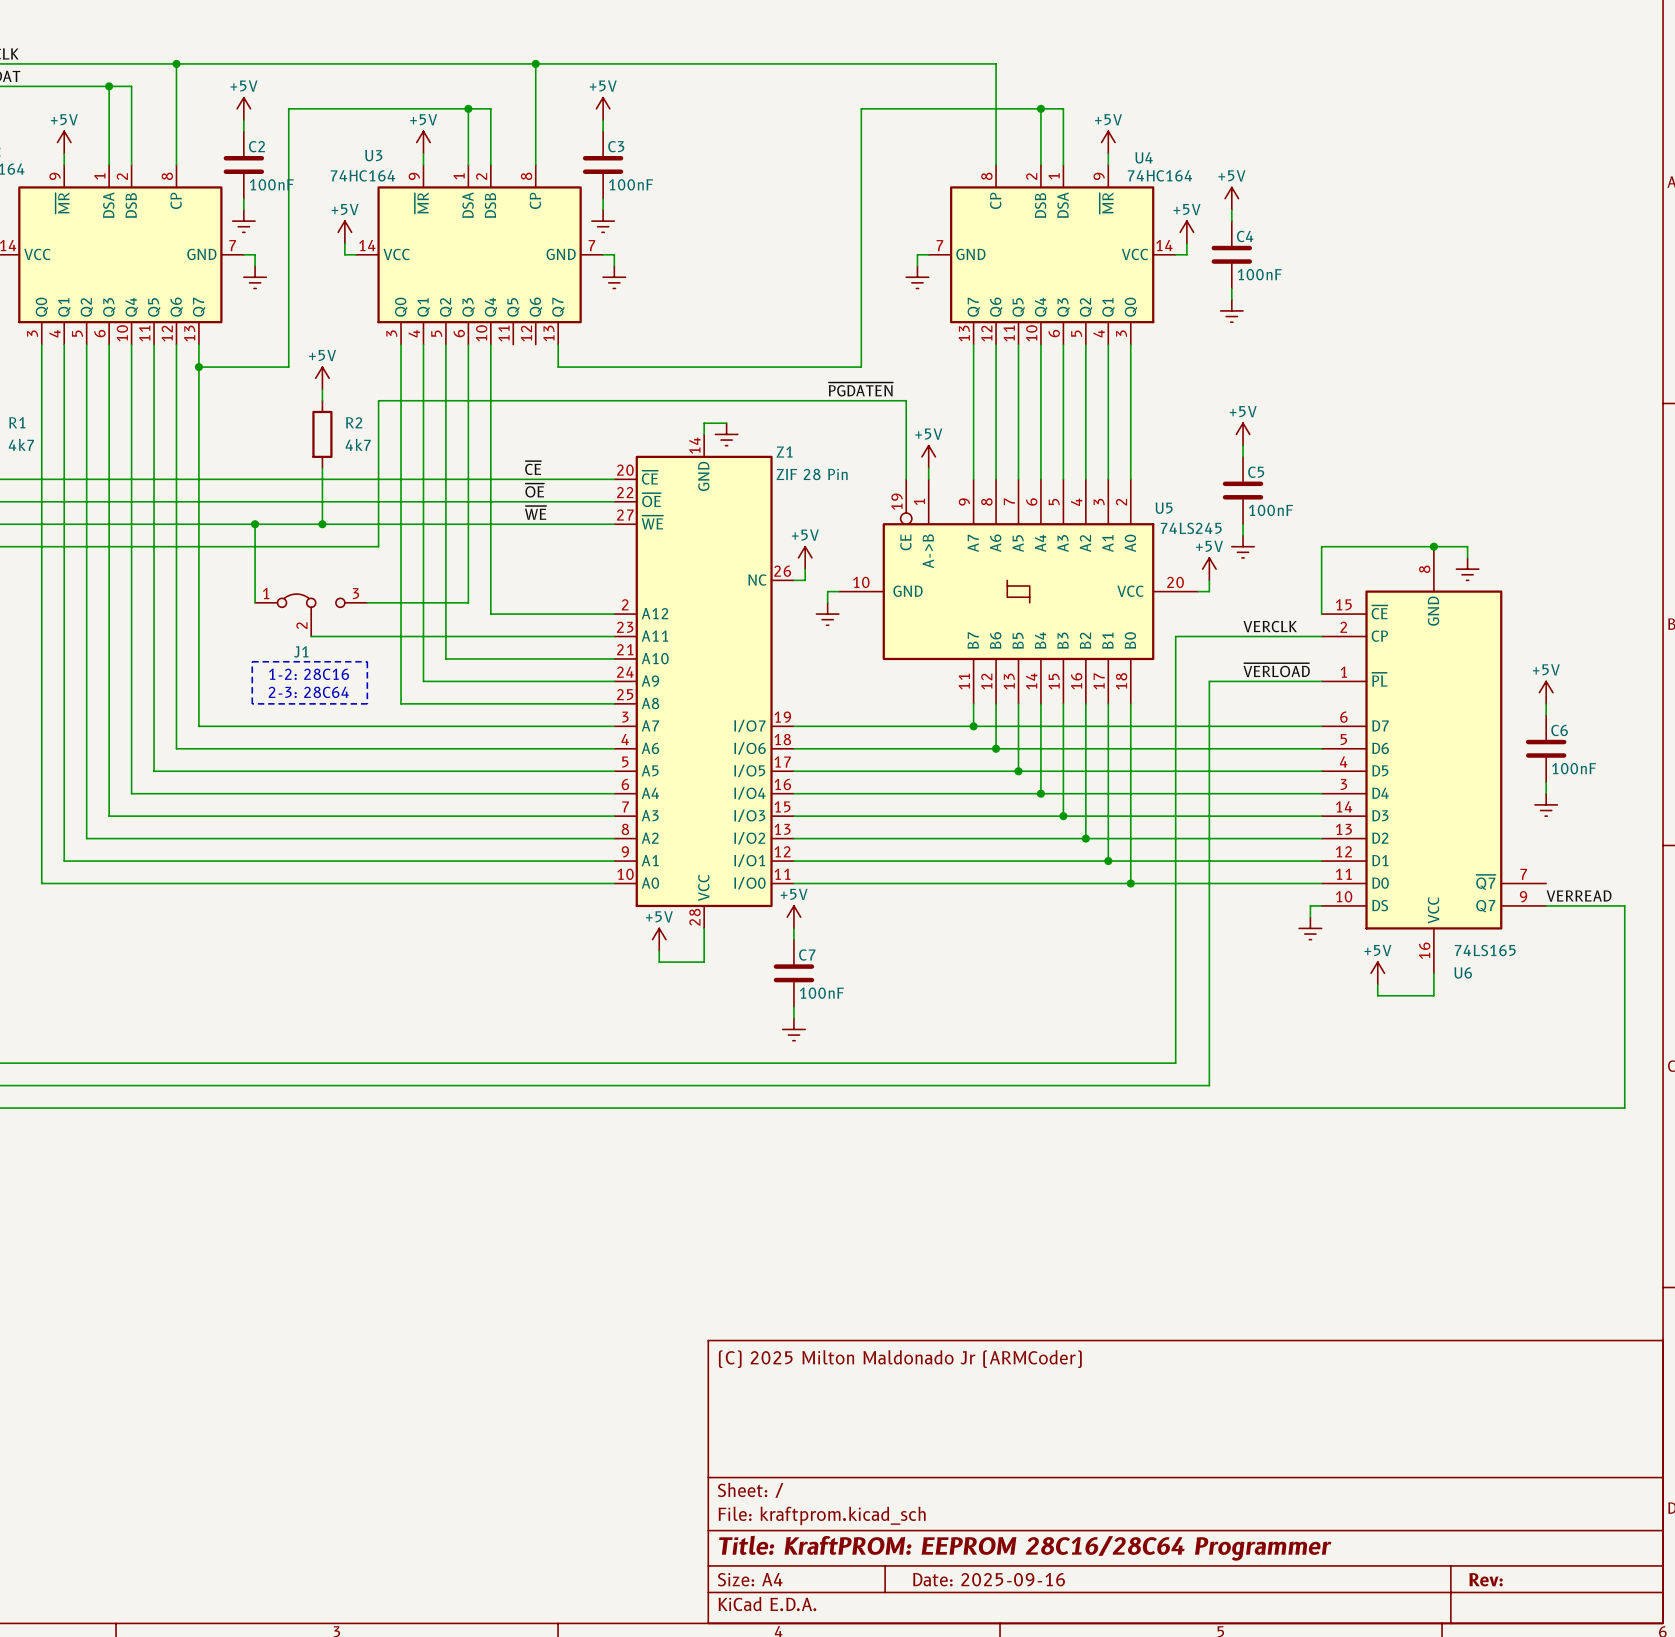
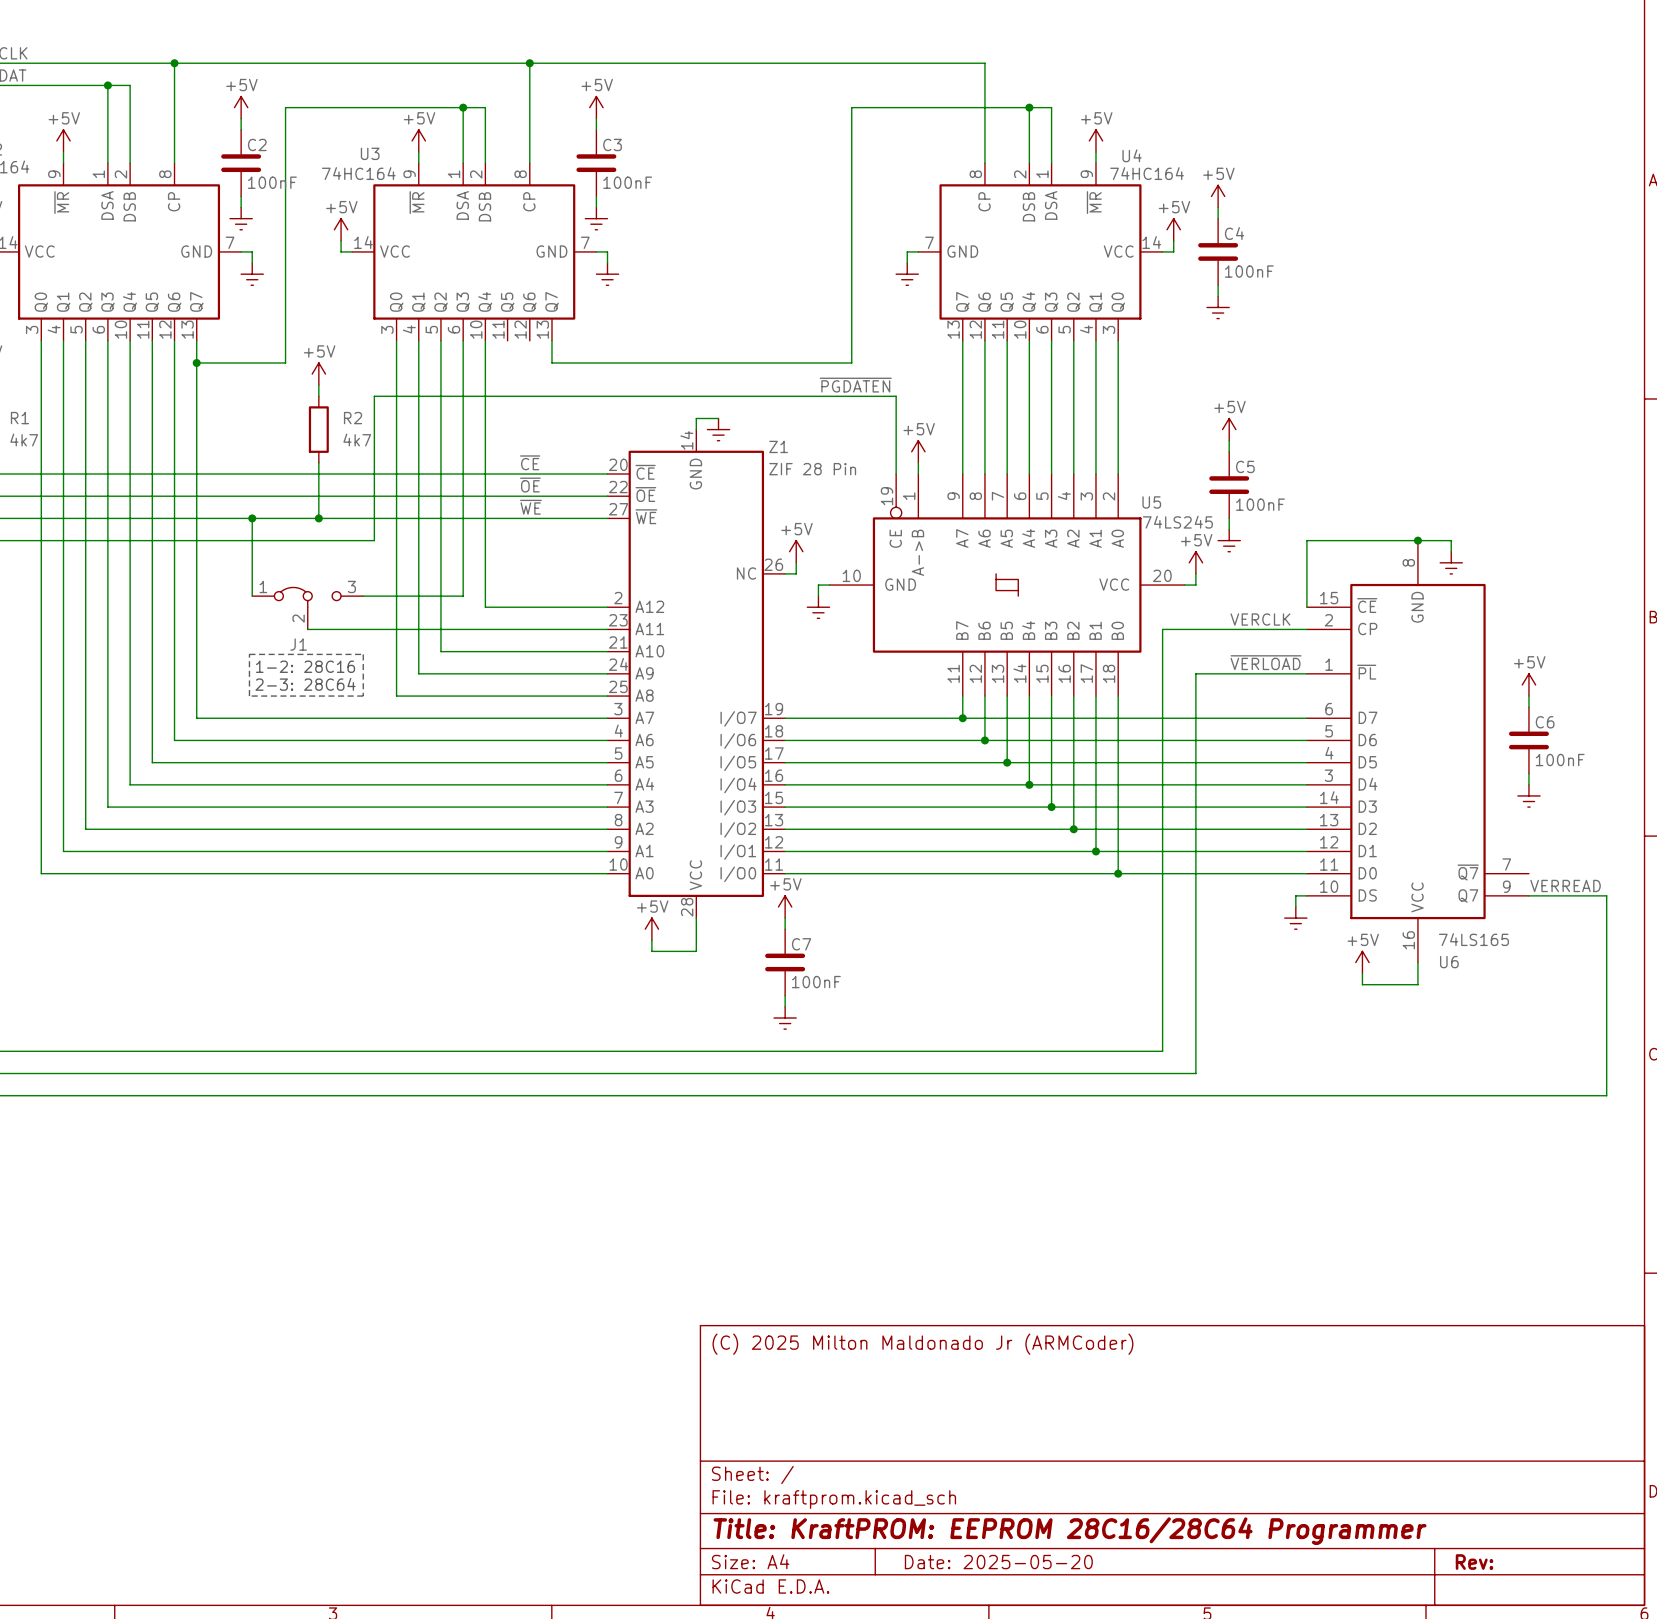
title block: Date: 2025-09-16 (989, 1579) -> Date: 2025-05-20 (998, 1562)

